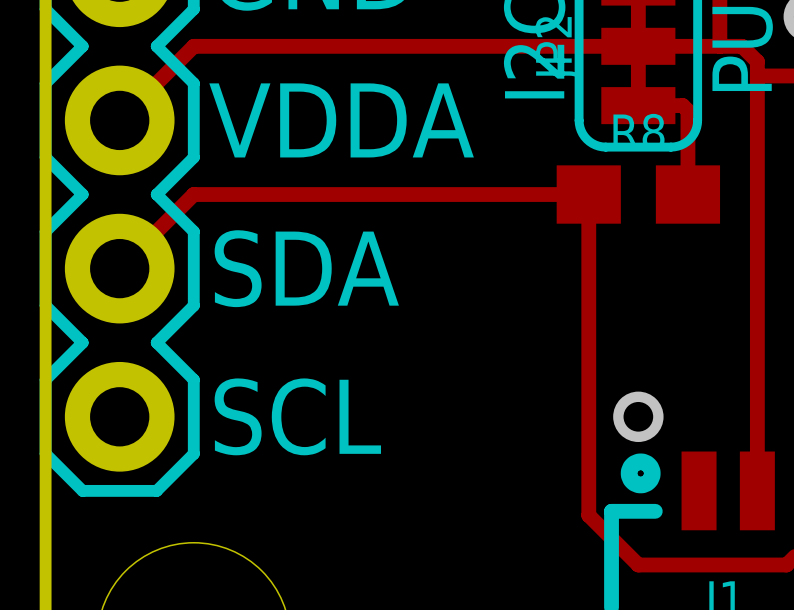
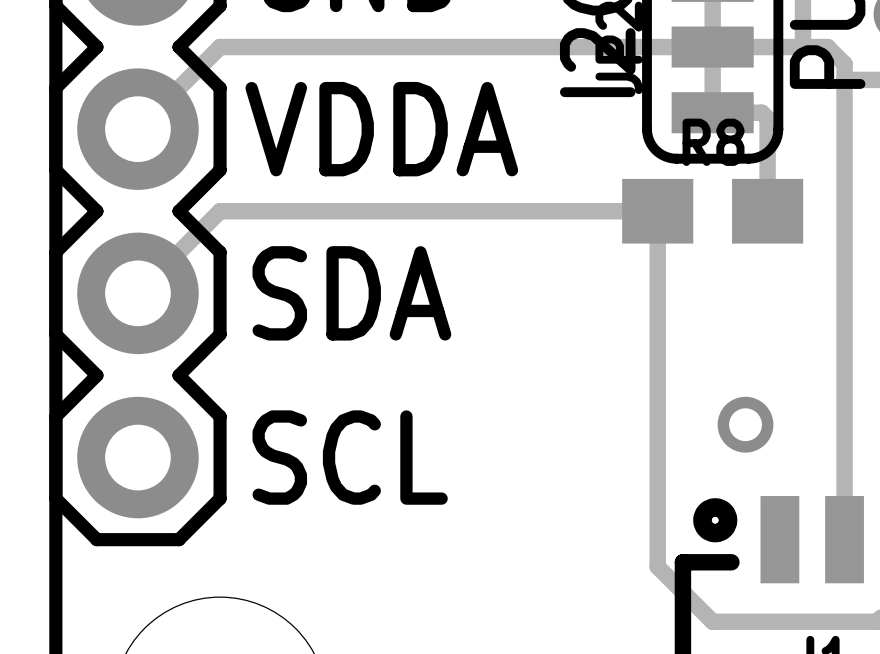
via position: (638, 416) -> (745, 424)

